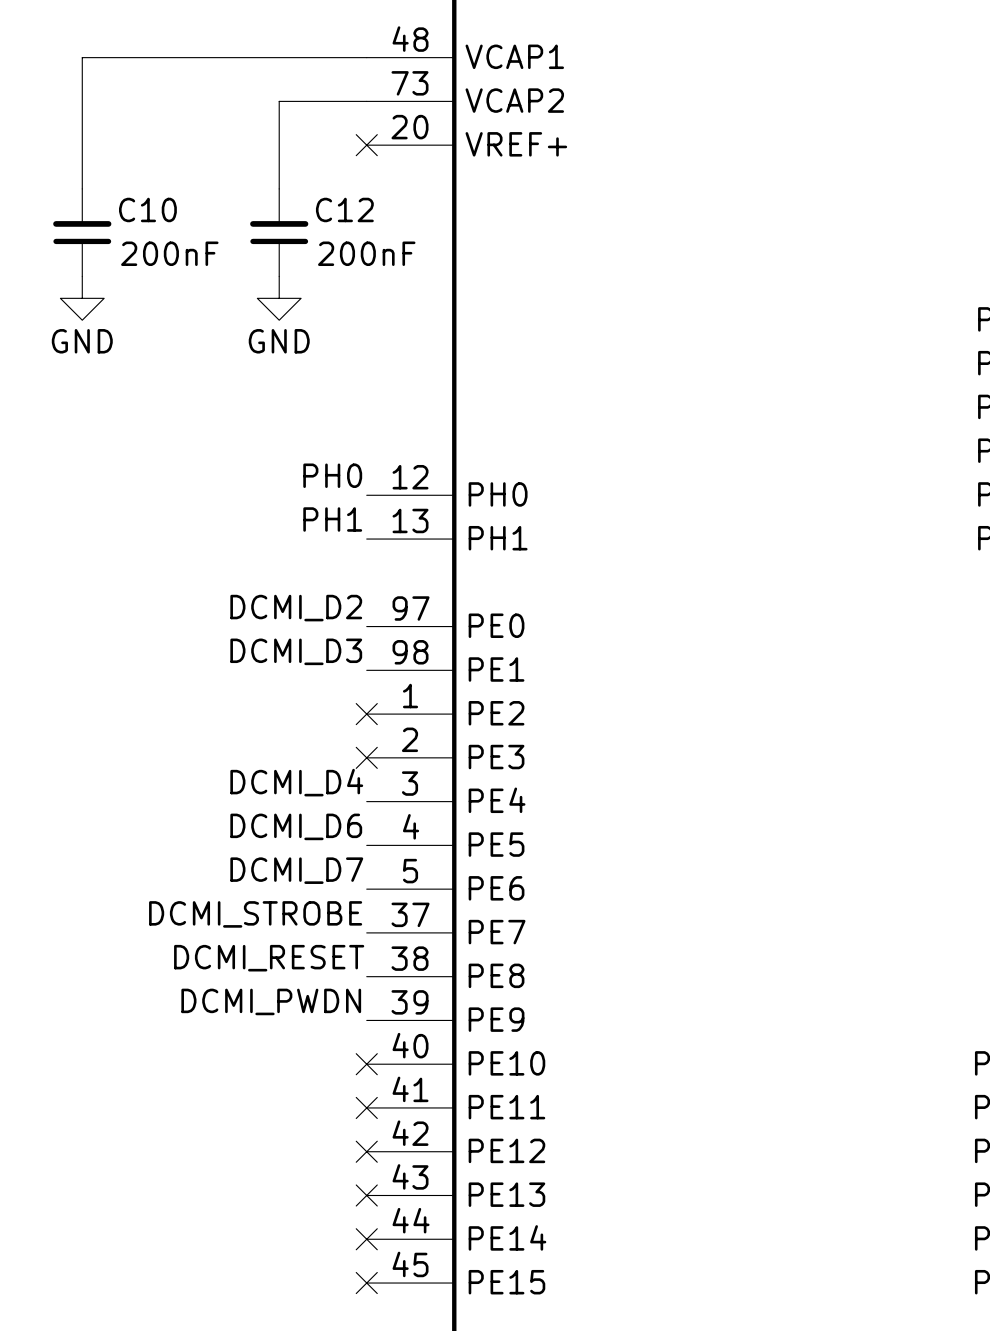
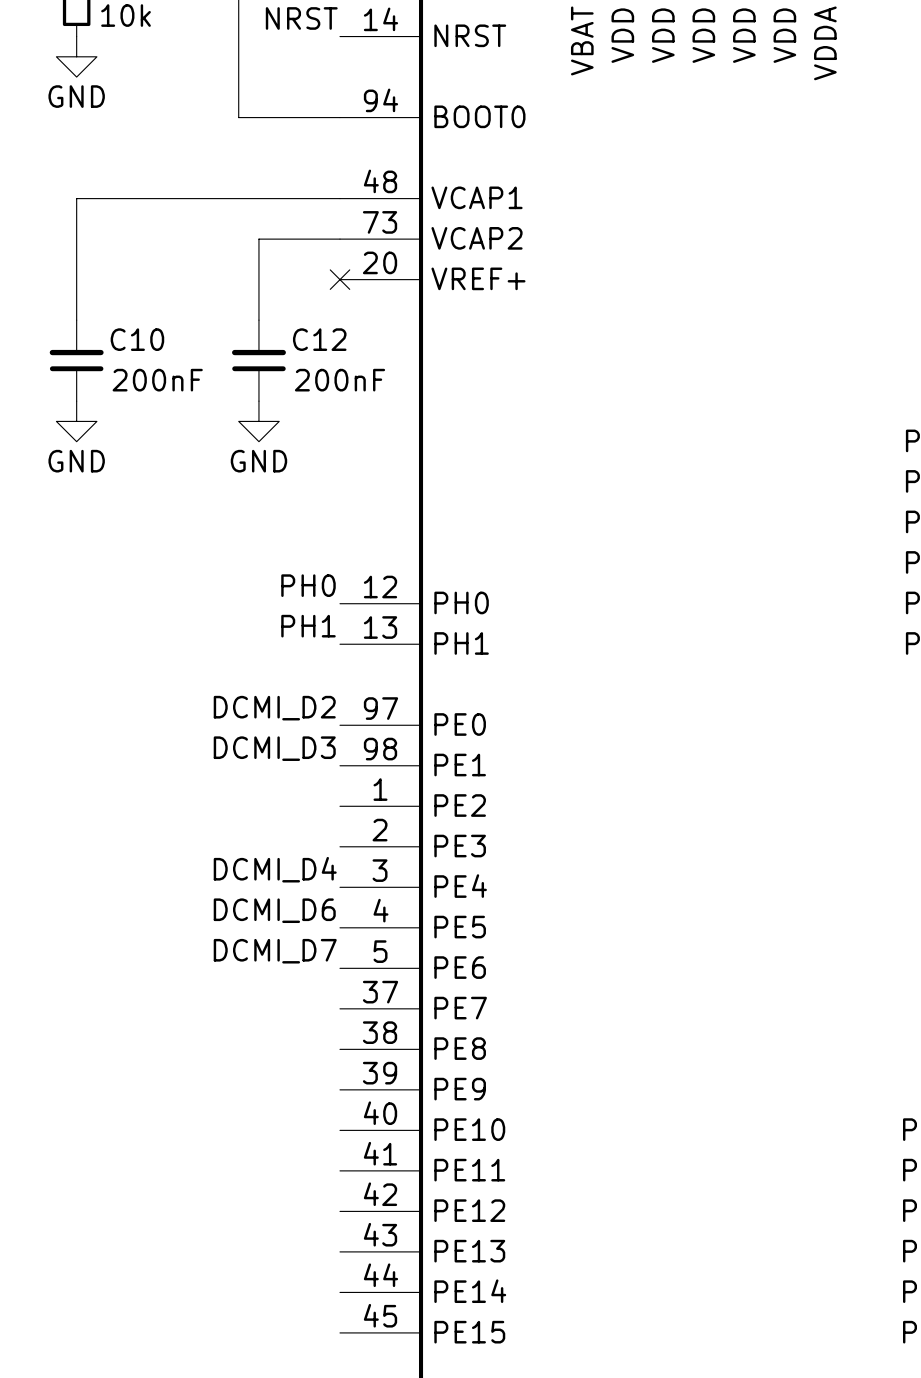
no-connect mark: (366, 714) -> none
no-connect mark: (366, 757) -> none
label: DCMI_STROBE (255, 914) -> none
label: DCMI_RESET (269, 958) -> none
label: DCMI_PWDN (271, 1001) -> none
no-connect mark: (366, 1064) -> none
no-connect mark: (366, 1107) -> none
no-connect mark: (366, 1151) -> none
no-connect mark: (366, 1195) -> none
no-connect mark: (366, 1239) -> none
no-connect mark: (366, 1283) -> none

